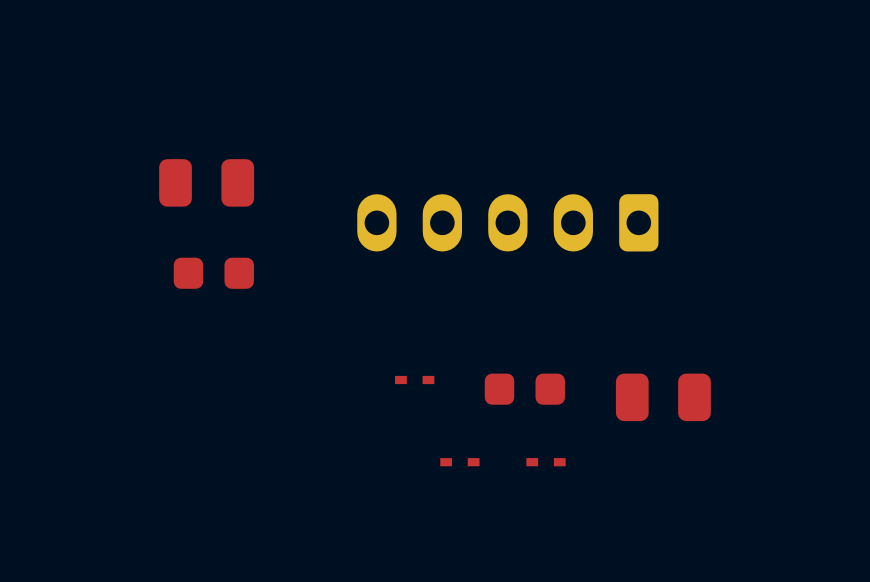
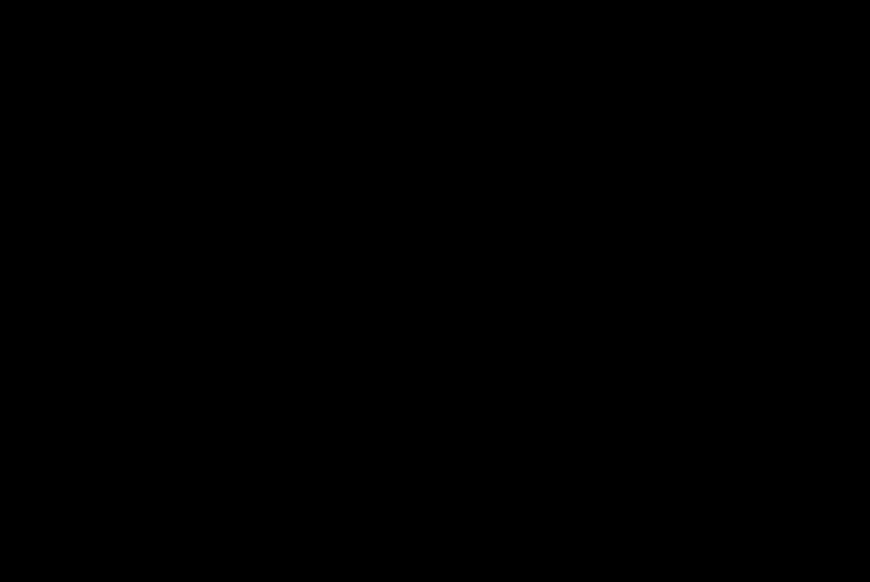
part: (206, 182) -> none
part: (507, 222) -> none
part: (213, 273) -> none
part: (414, 380) -> none
part: (524, 389) -> none
part: (663, 397) -> none
part: (459, 462) -> none
part: (546, 462) -> none

